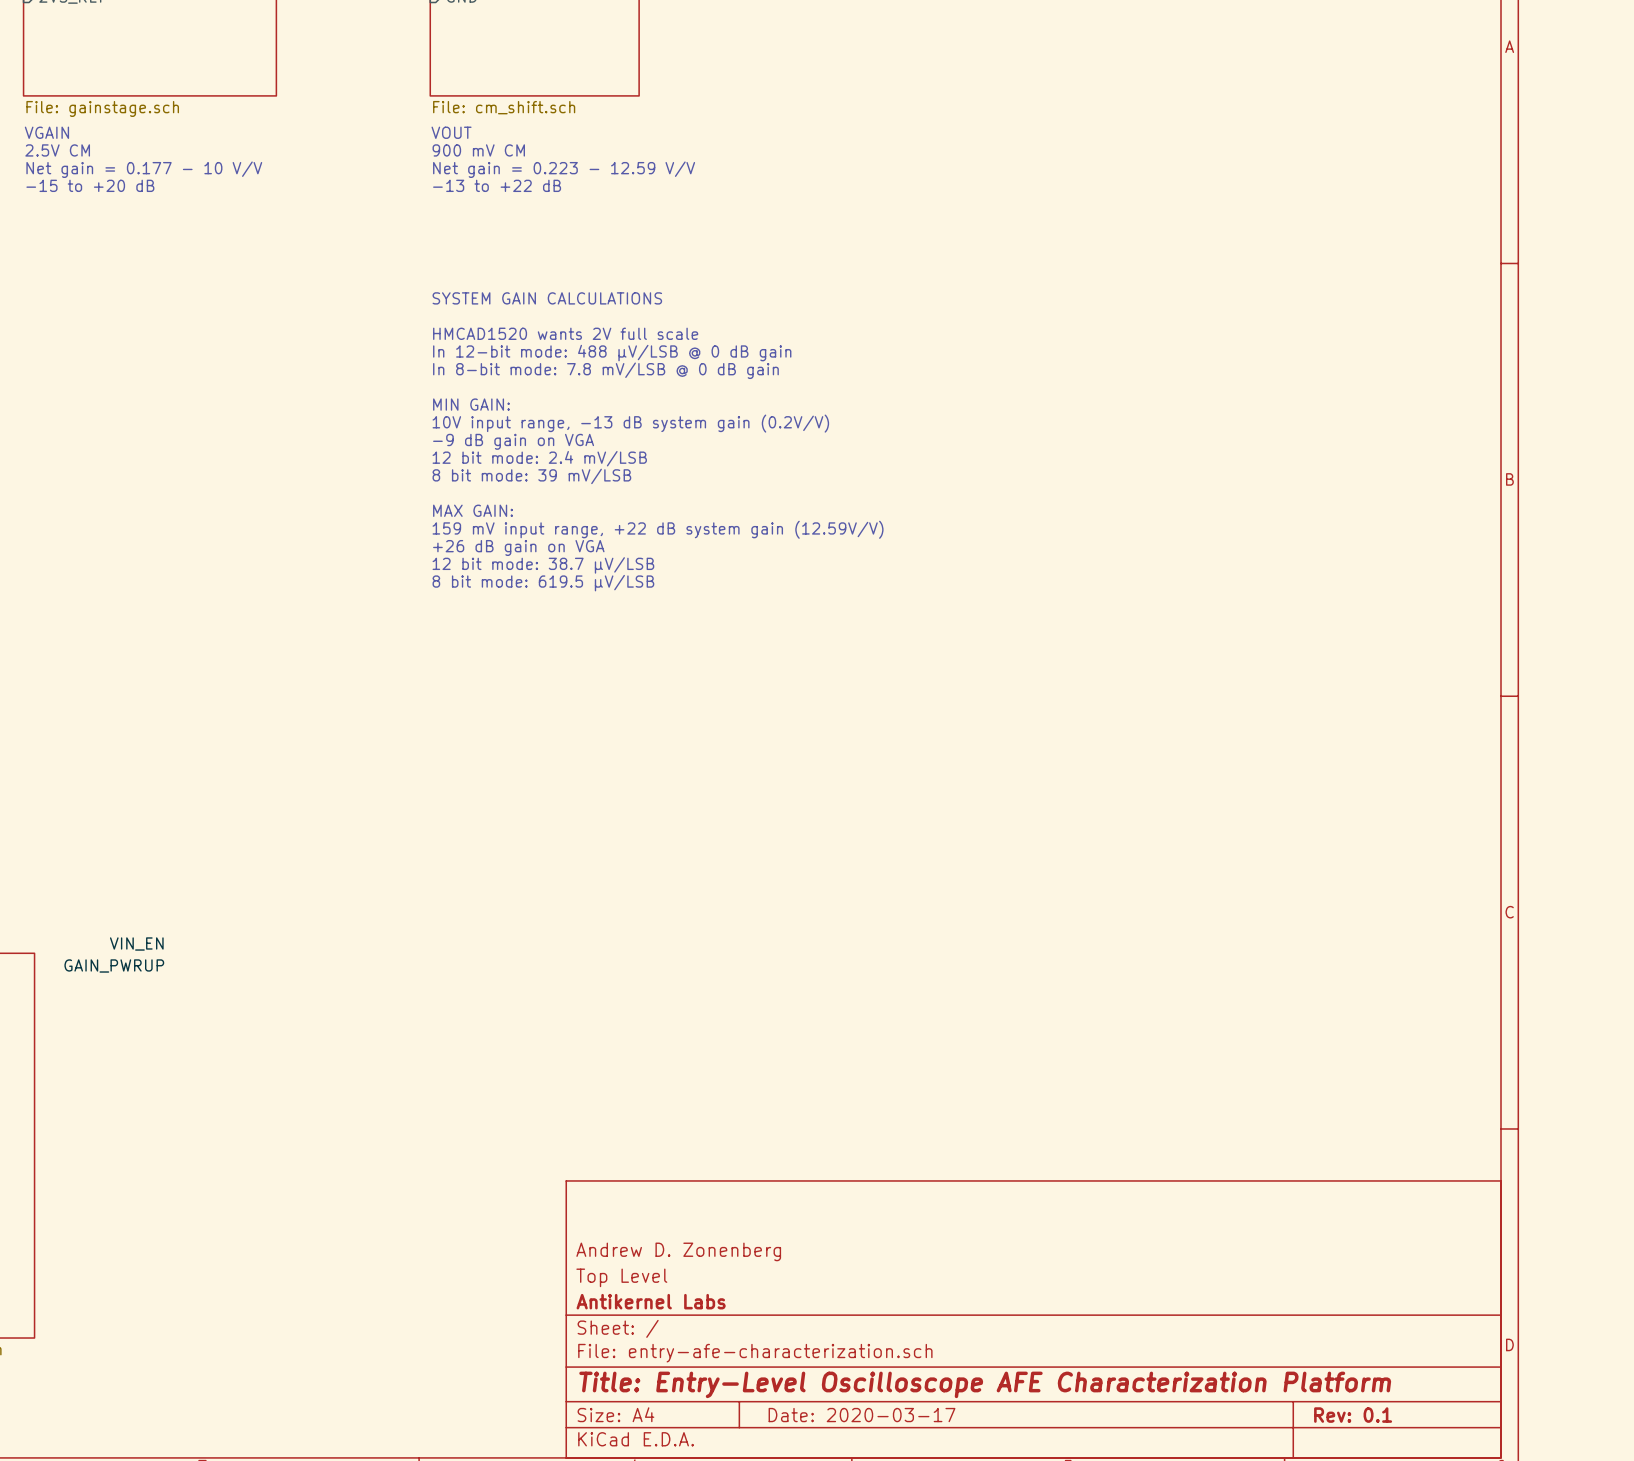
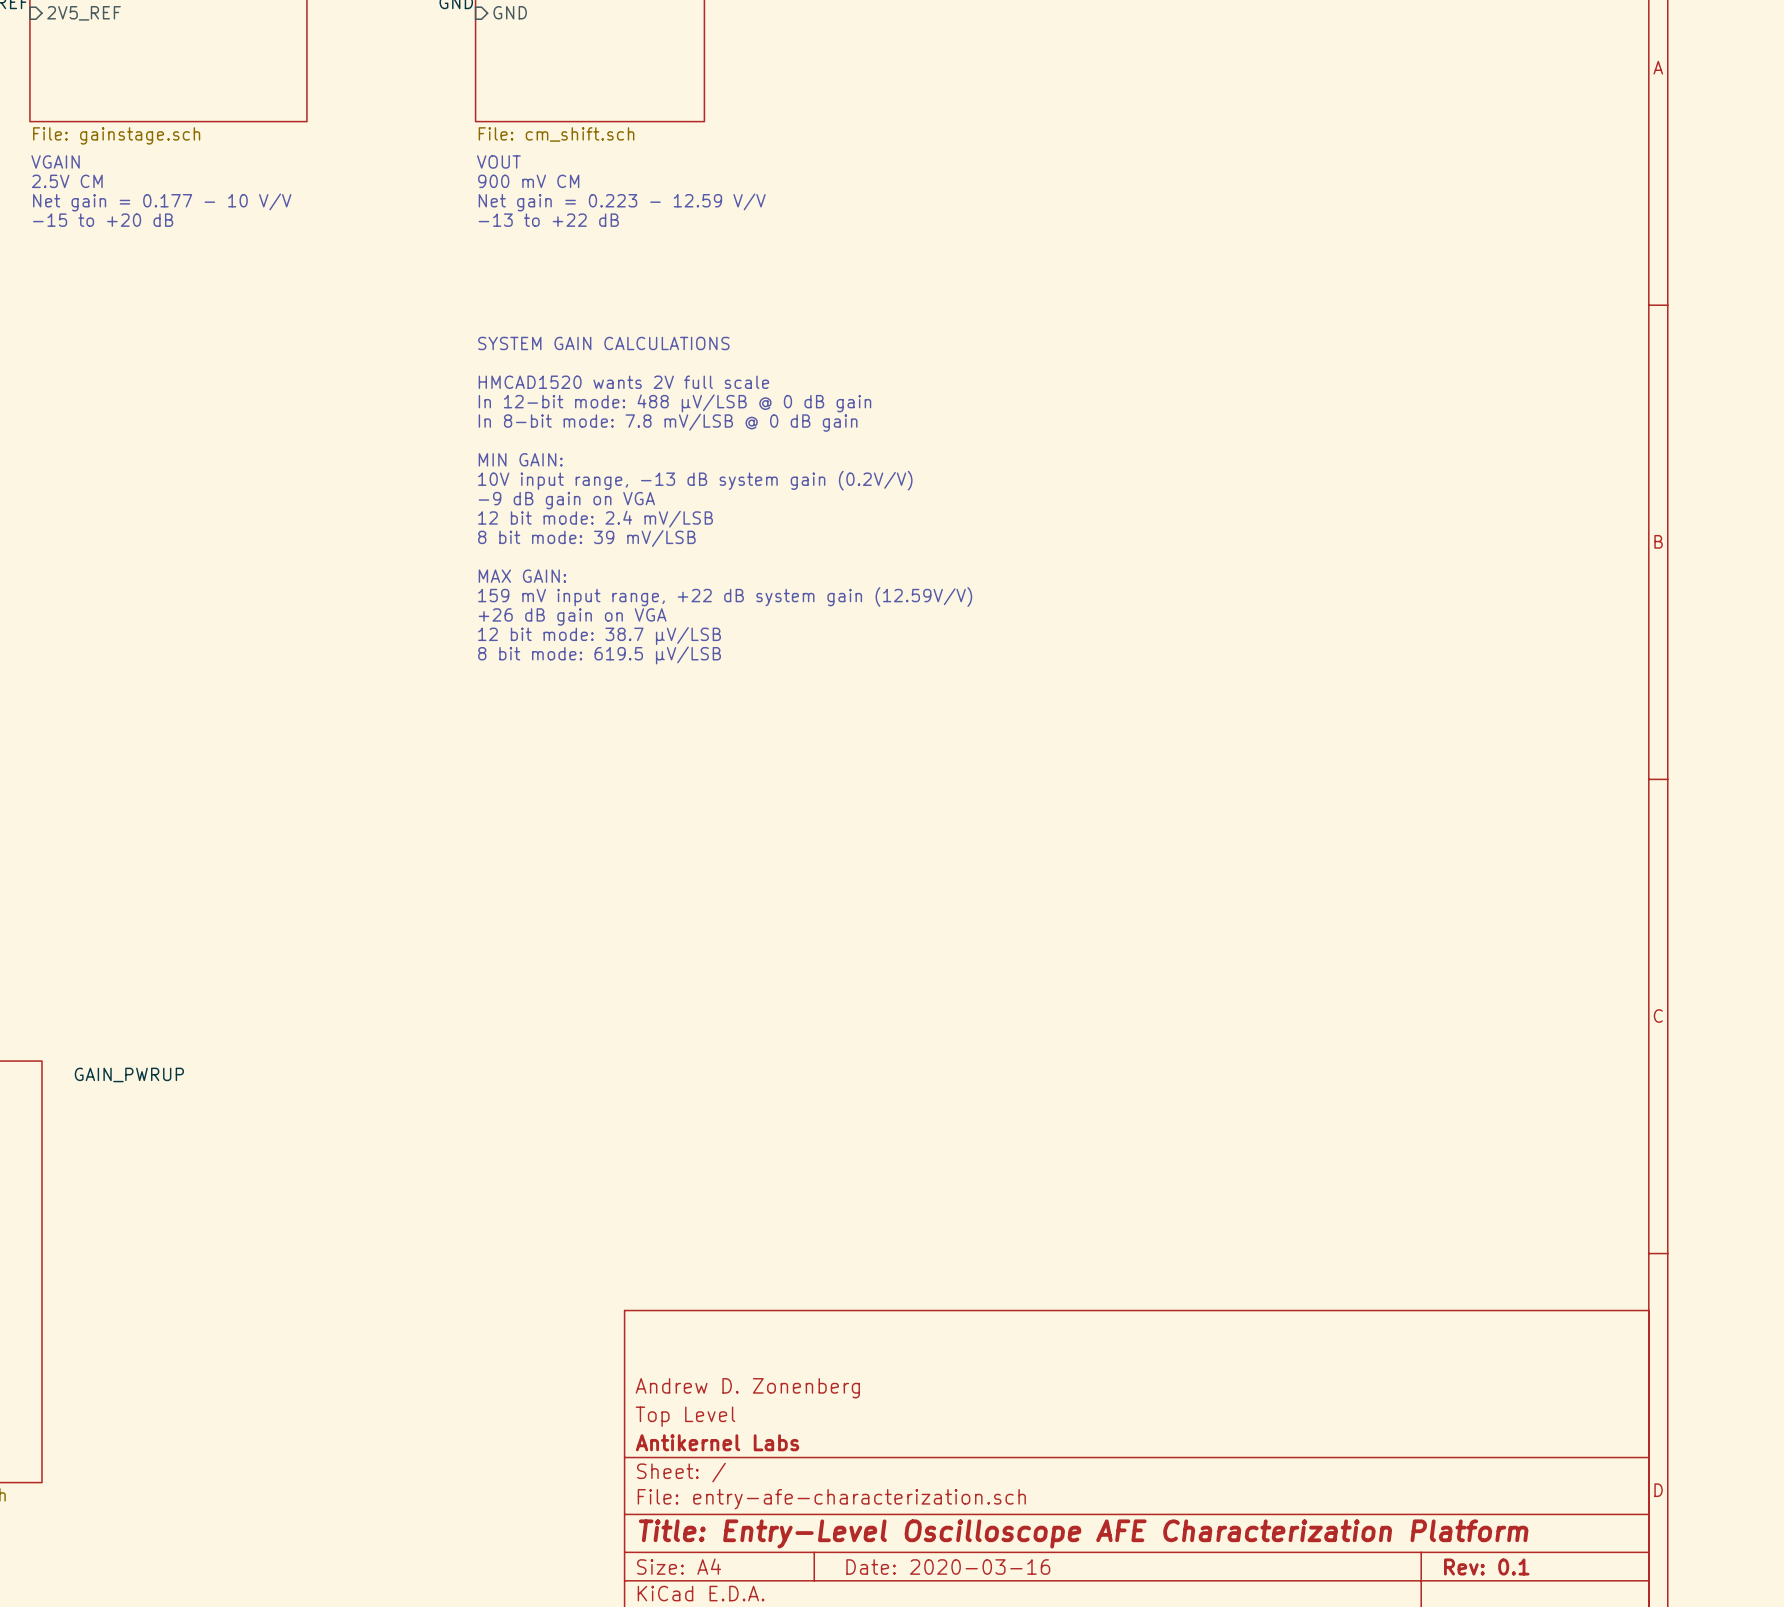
label: VIN_EN (136, 944) -> none
title block: Date: 2020-03-17 (862, 1415) -> Date: 2020-03-16 (948, 1567)

